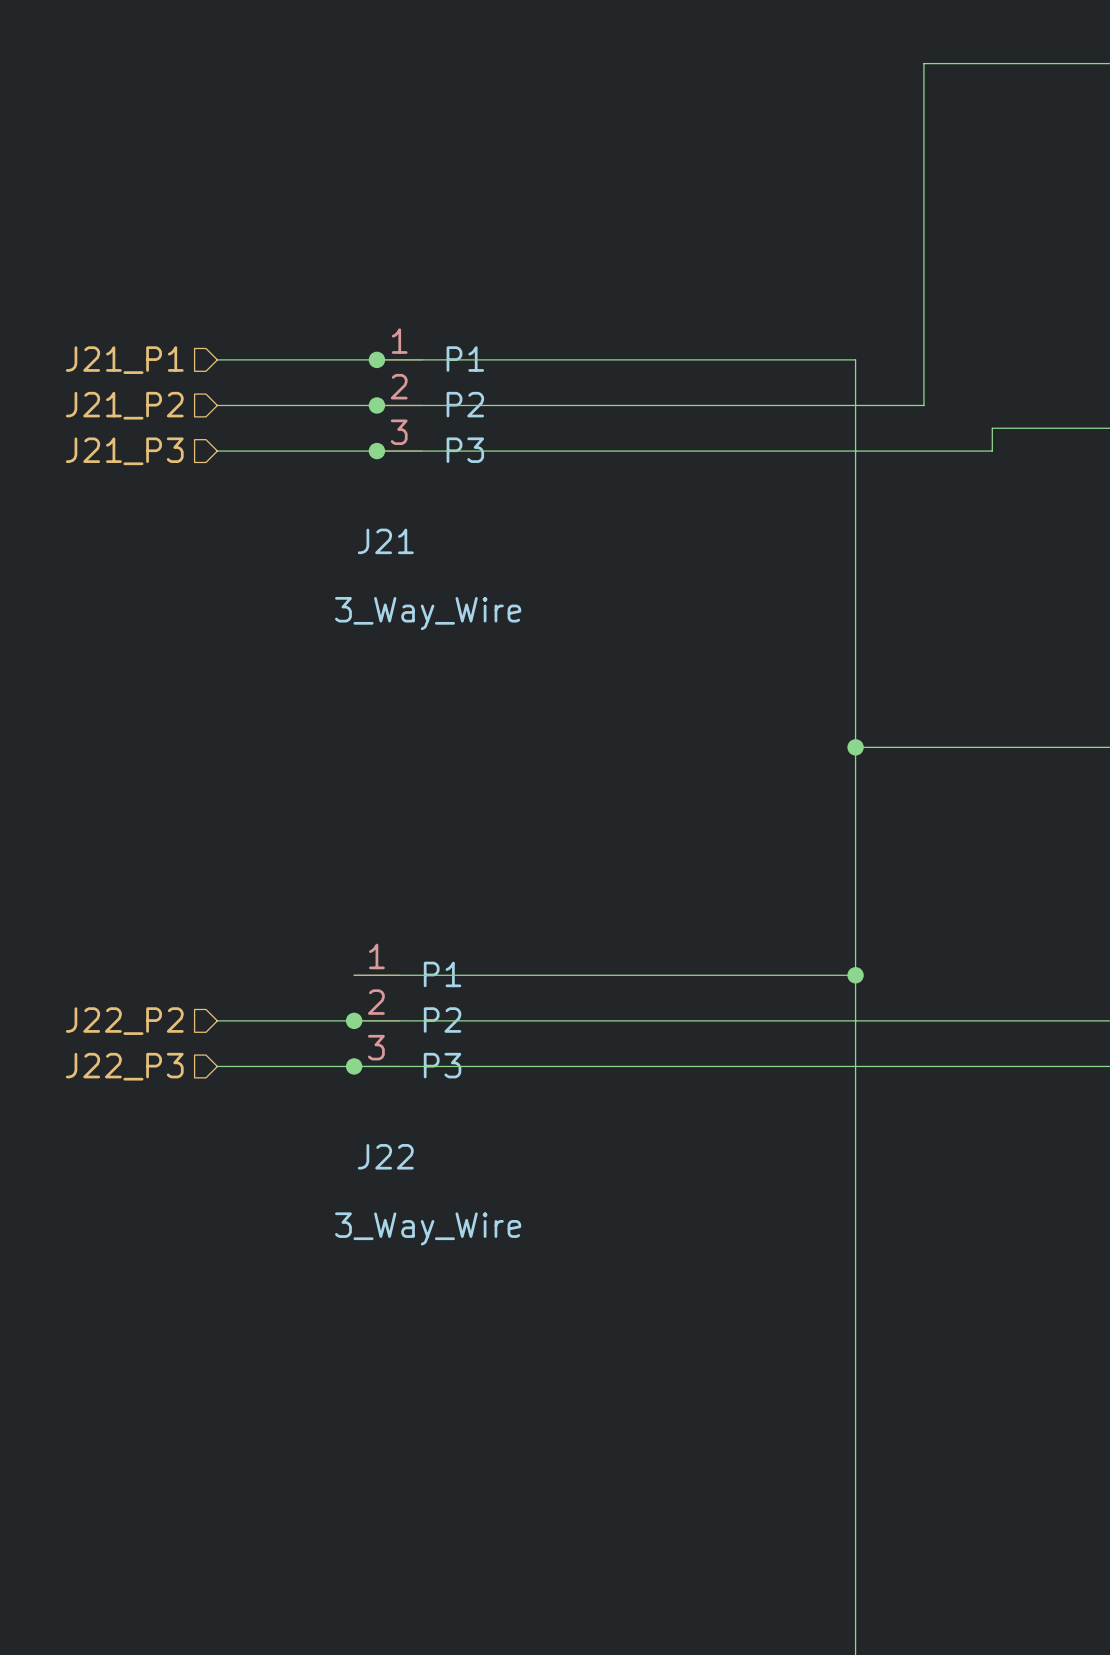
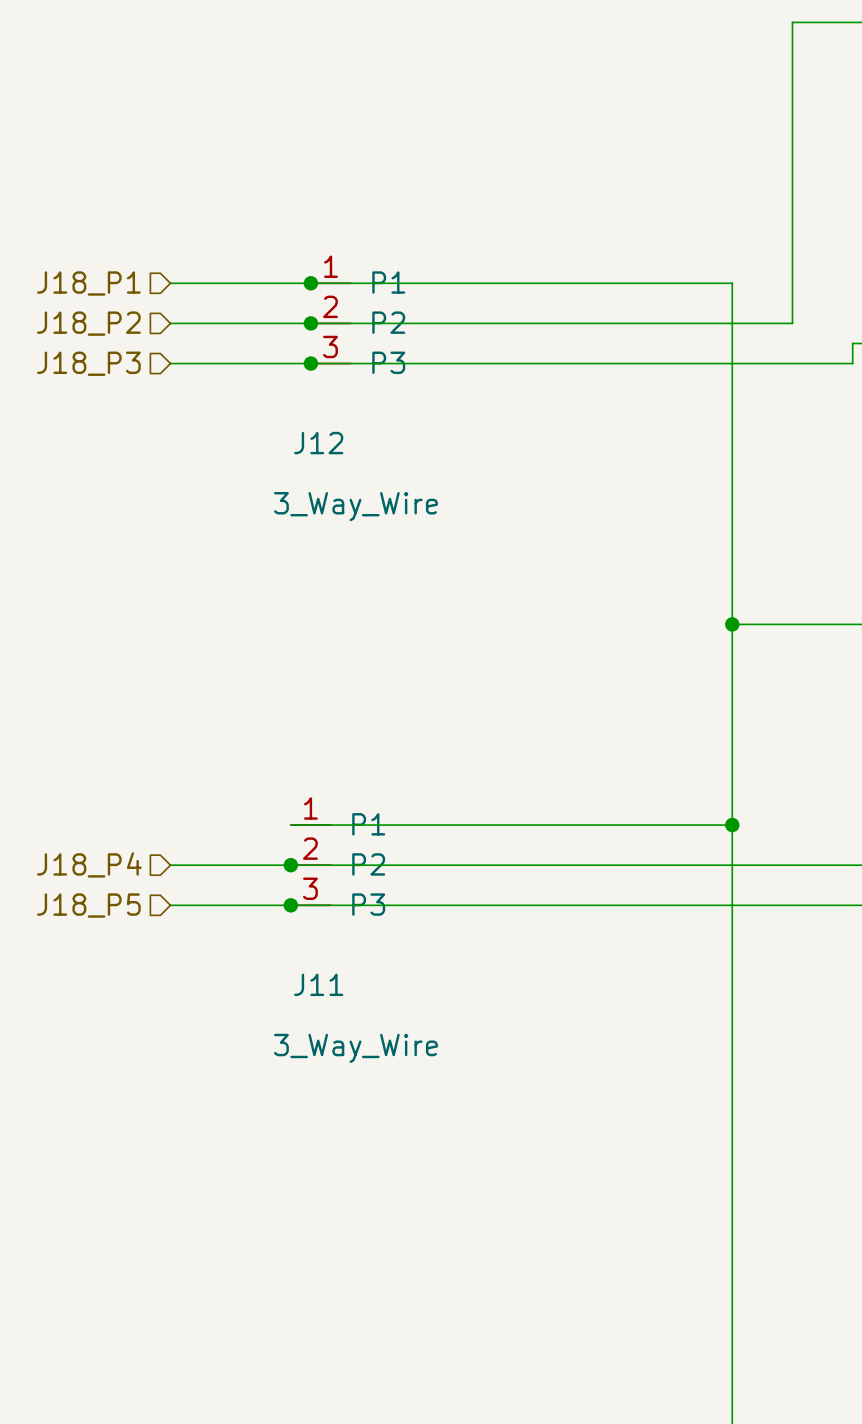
hierarchical label: J21_P1 (124, 360) -> J18_P1 (88, 283)
hierarchical label: J21_P2 (124, 405) -> J18_P2 (88, 323)
hierarchical label: J21_P3 (124, 451) -> J18_P3 (88, 363)
J21 name: J21 (385, 541) -> J12 (318, 443)
hierarchical label: J22_P2 (124, 1021) -> J18_P4 (89, 864)
hierarchical label: J22_P3 (124, 1066) -> J18_P5 (88, 905)
J22 name: J22 (385, 1156) -> J11 (318, 984)

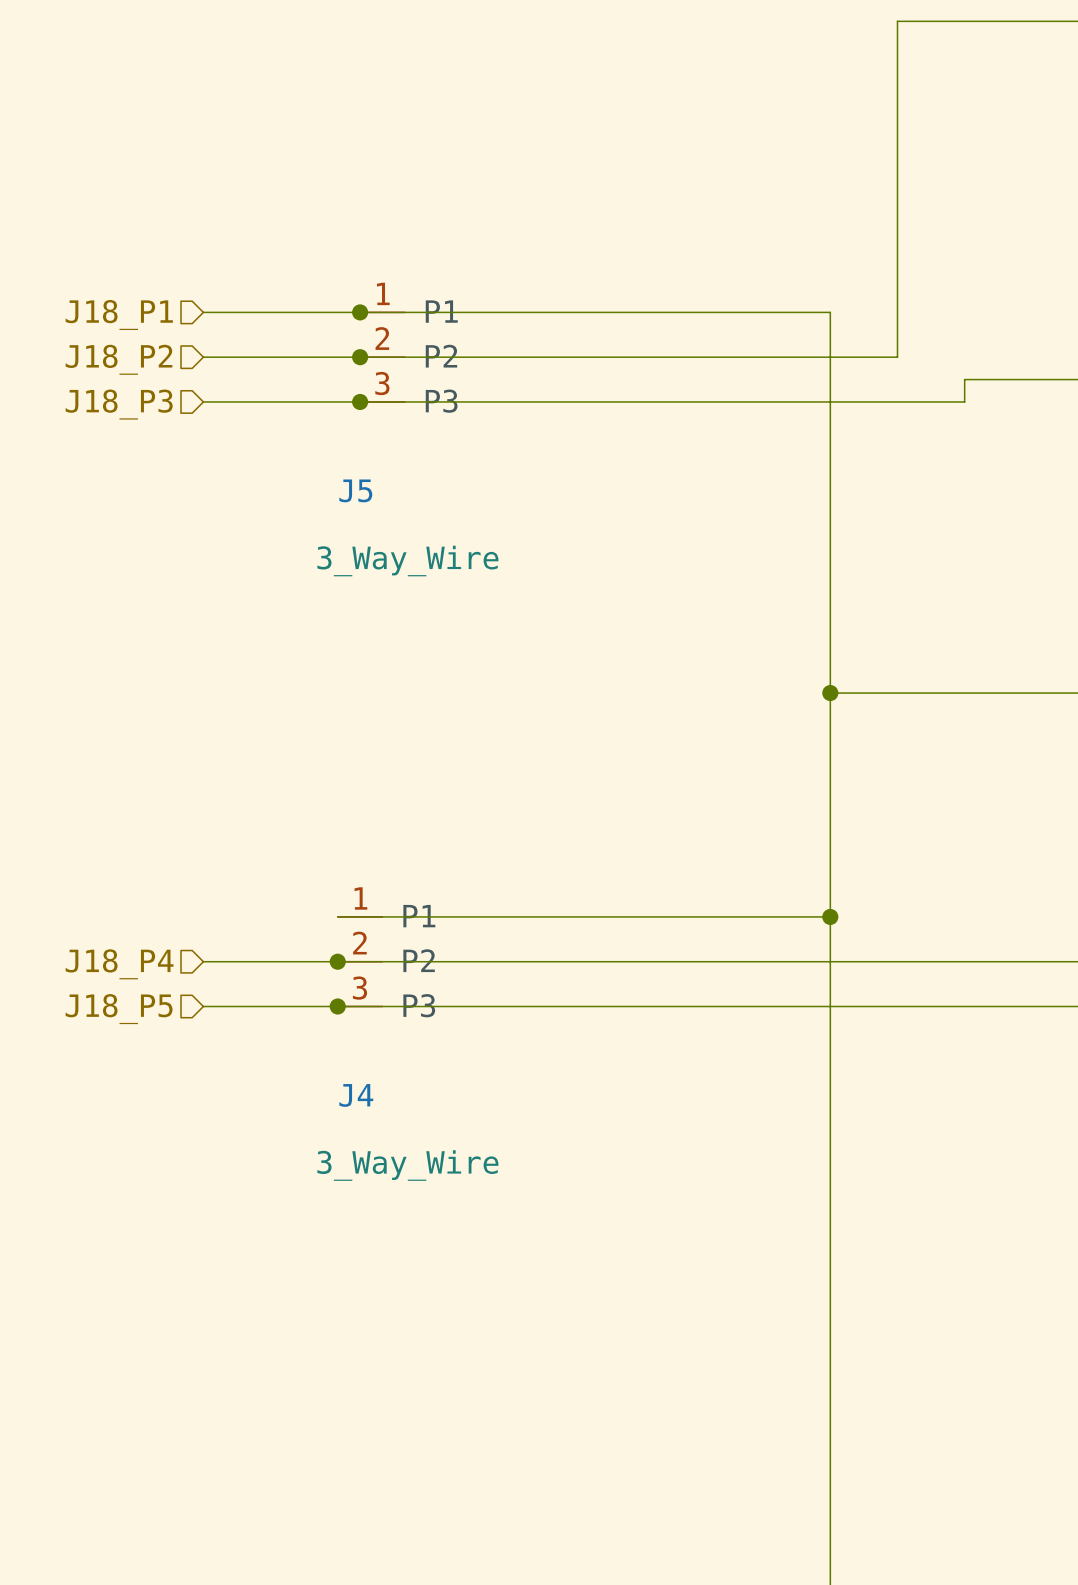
J12 name: J12 (318, 443) -> J5 (355, 490)
J11 name: J11 (318, 984) -> J4 (356, 1095)

